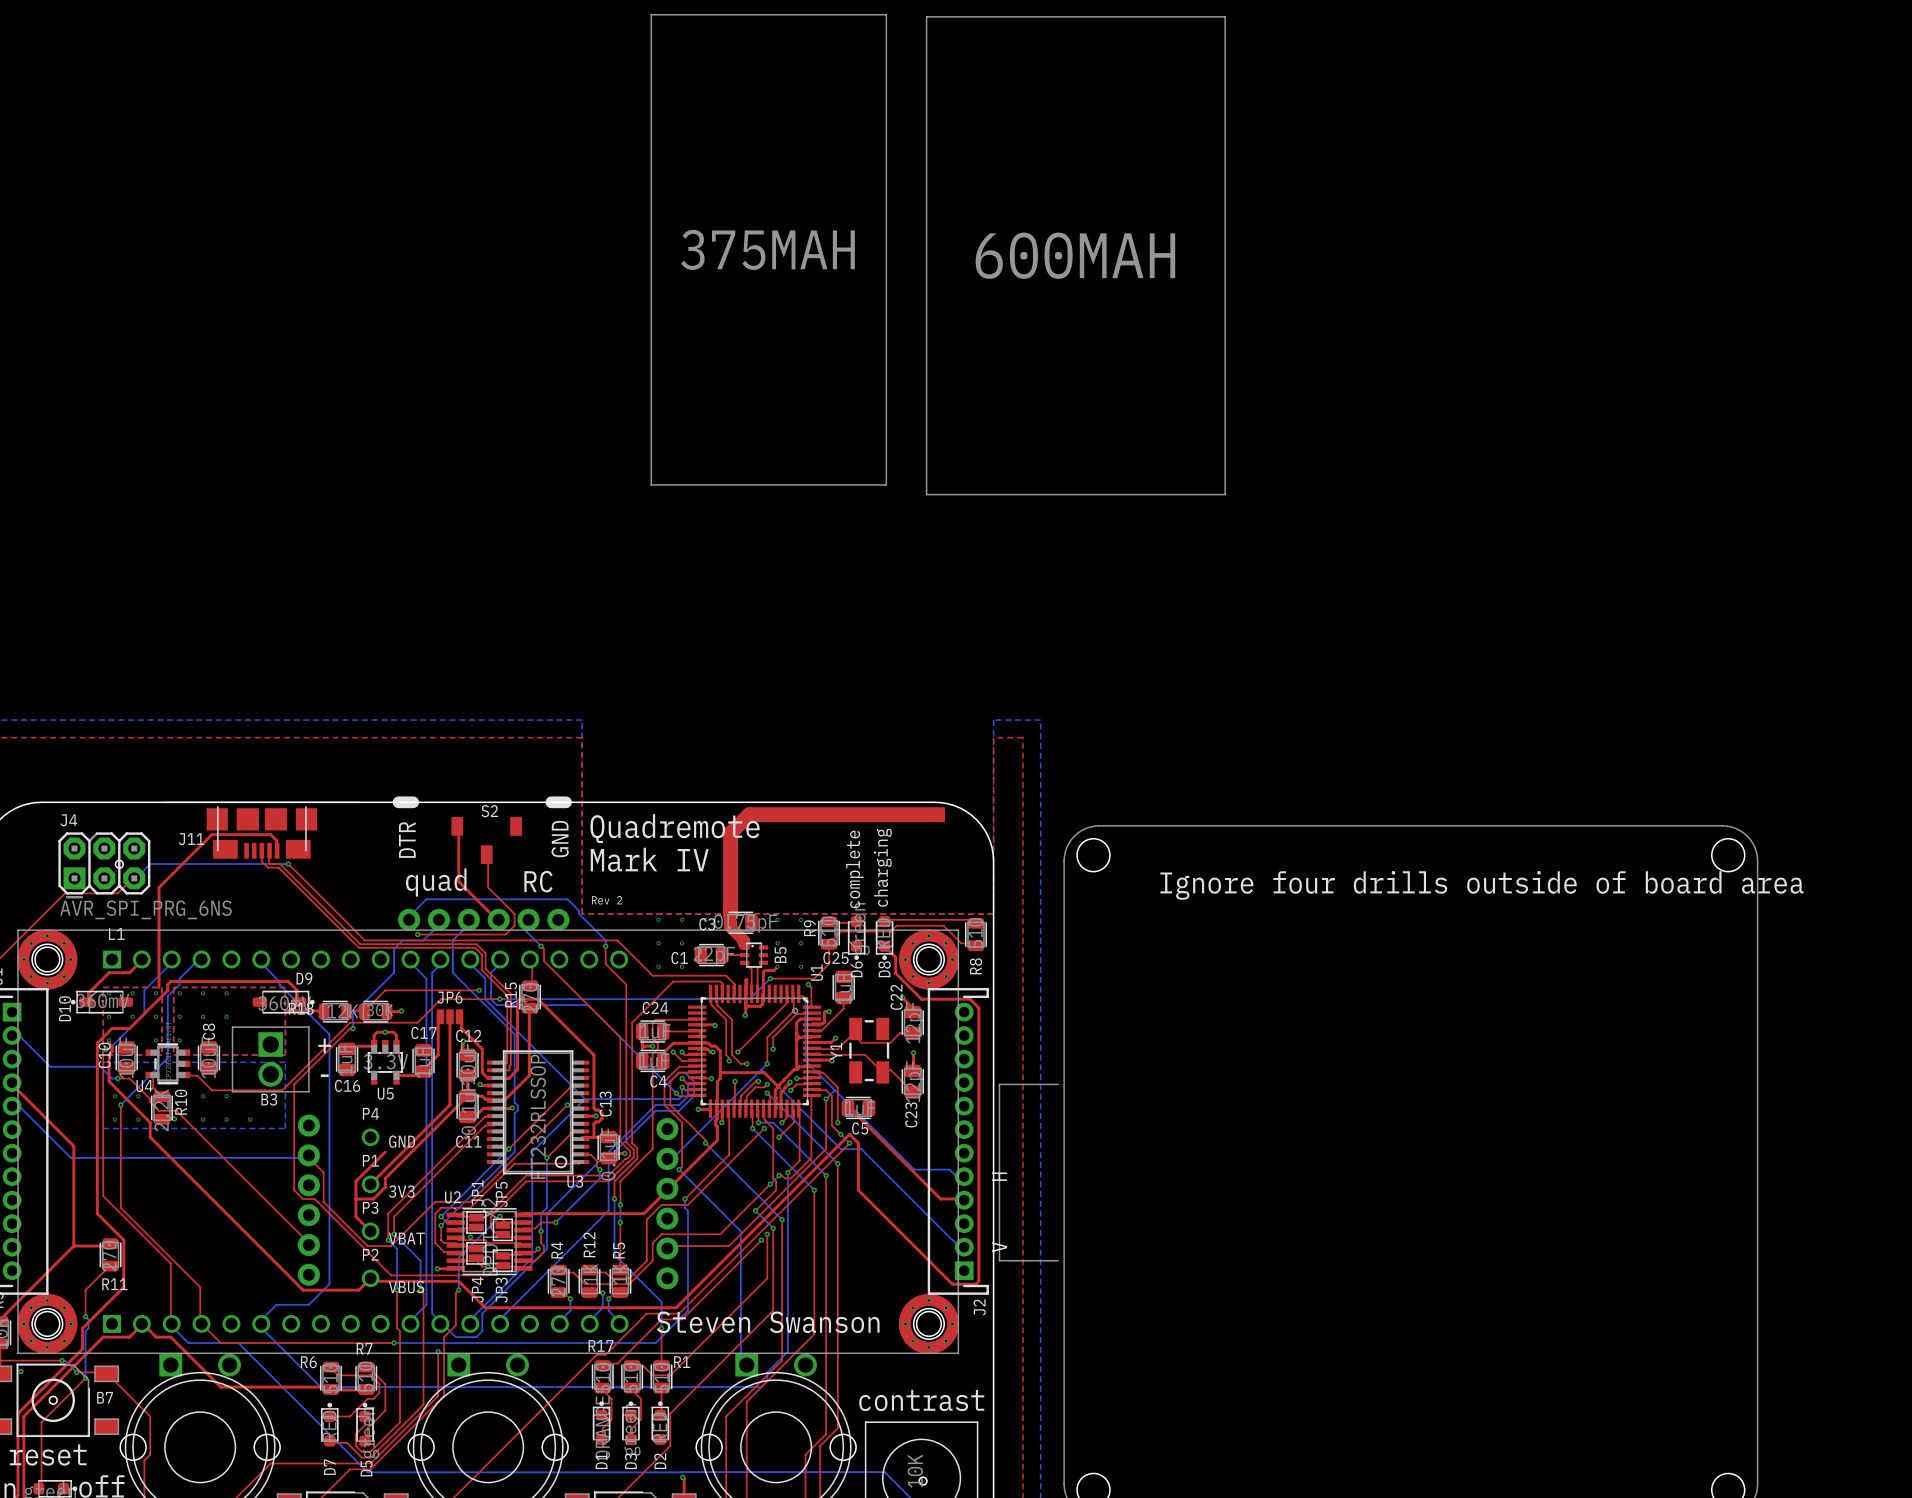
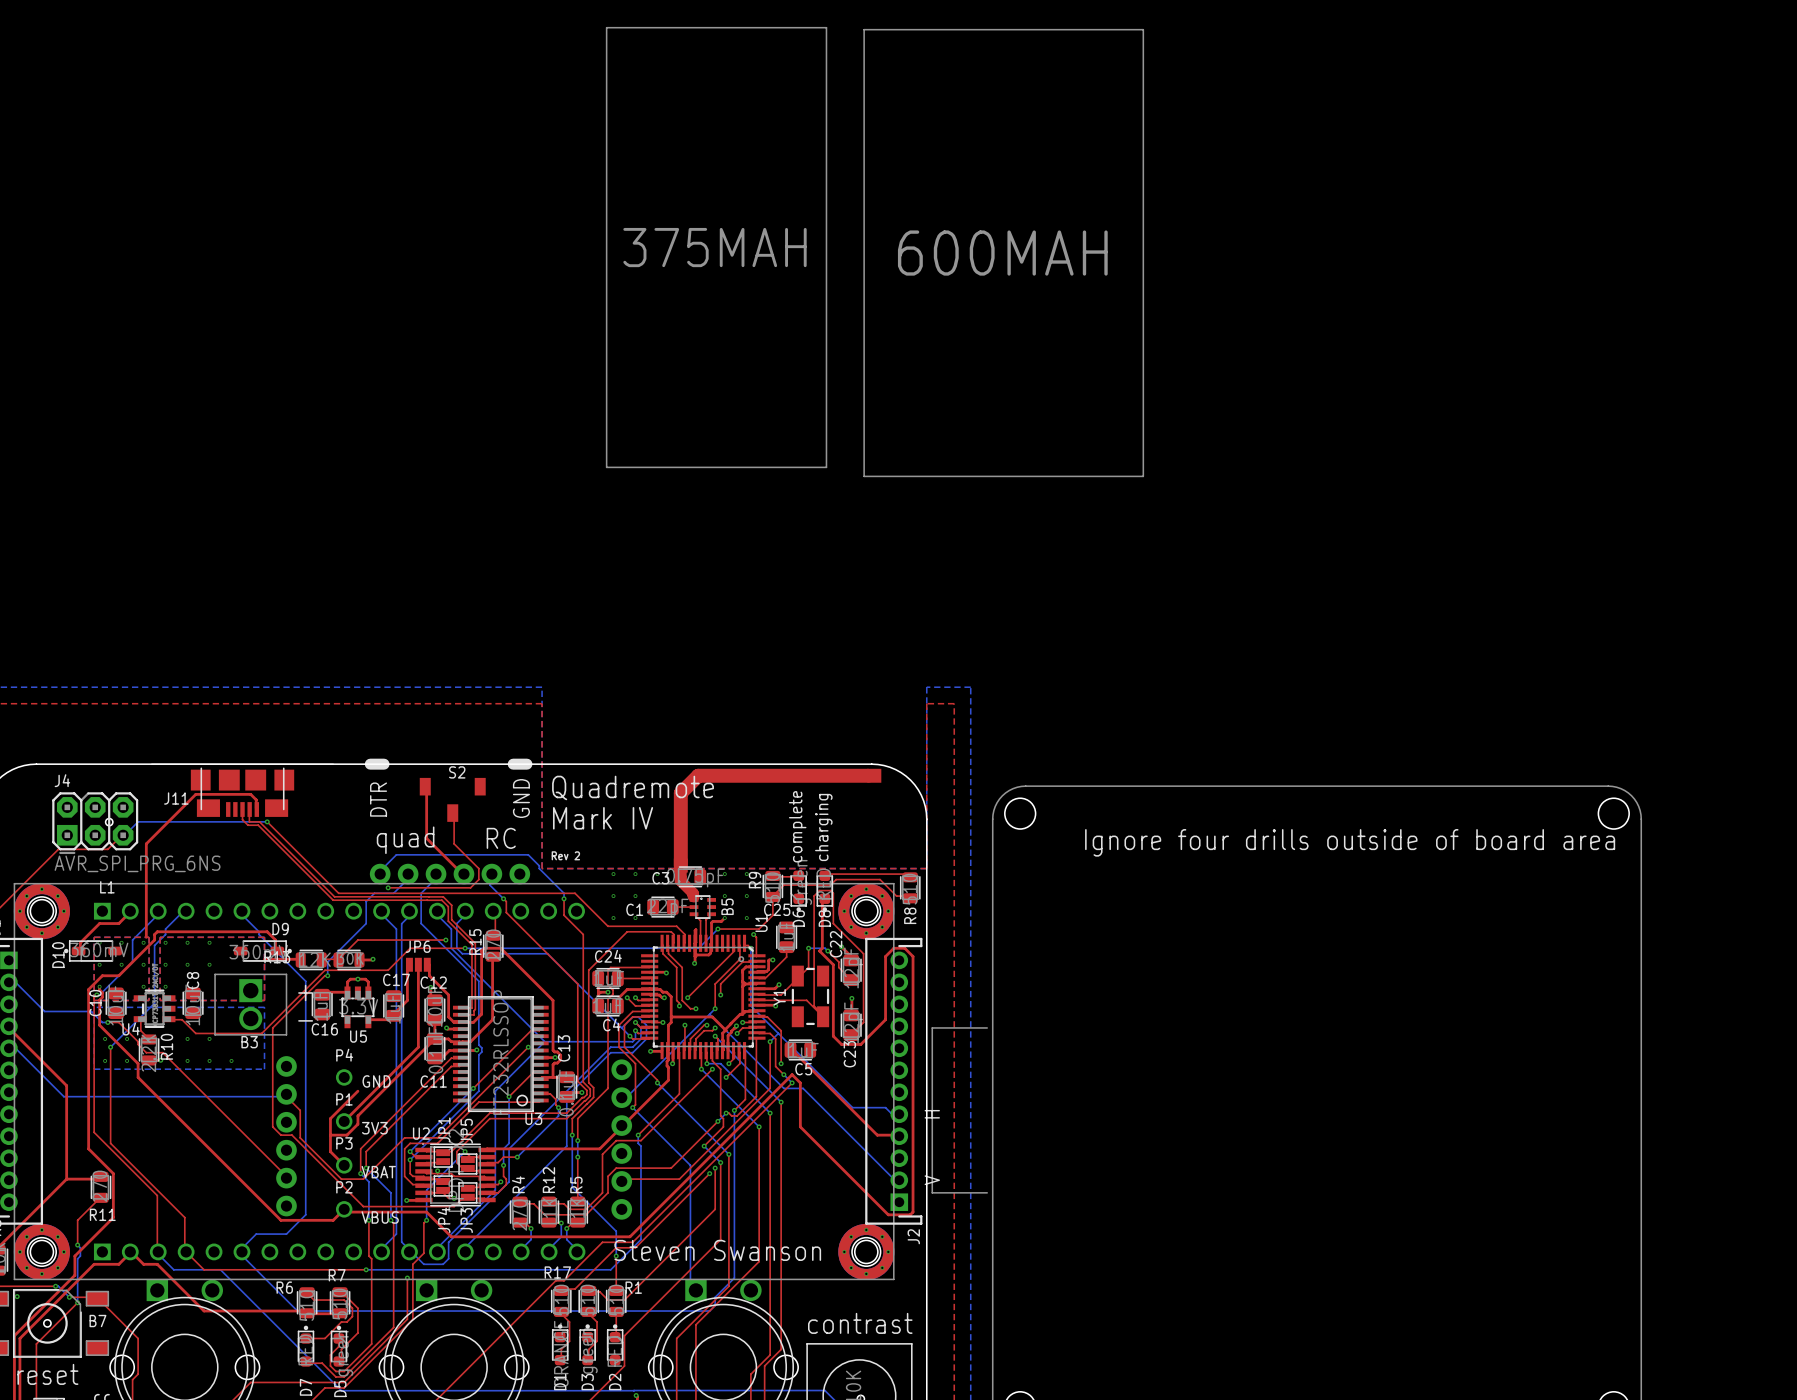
top track: (884, 946) (895, 957) (895, 973) (921, 999) (958, 999) -> (822, 898) (822, 948) (819, 951) (833, 964) (833, 1036) (841, 1044) (860, 1044) (885, 1019) (885, 956) (893, 948)
top track: none -> (808, 948) (808, 967) (800, 975)
bottom track: none -> (808, 948) (825, 948) (827, 951)
via: none -> (808, 948)
top track: none -> (827, 951) (838, 962) (838, 967) (849, 978)
via: none -> (827, 951)
top track: (912, 1033) (899, 1033) (890, 1042) (861, 1042) (852, 1034) -> none
top track: (881, 1069) (890, 1069) (912, 1091) -> (822, 1014) (814, 1005) (814, 896) (819, 890) (830, 890) (833, 893) (833, 923) (863, 953) (863, 1022) (852, 1033)

